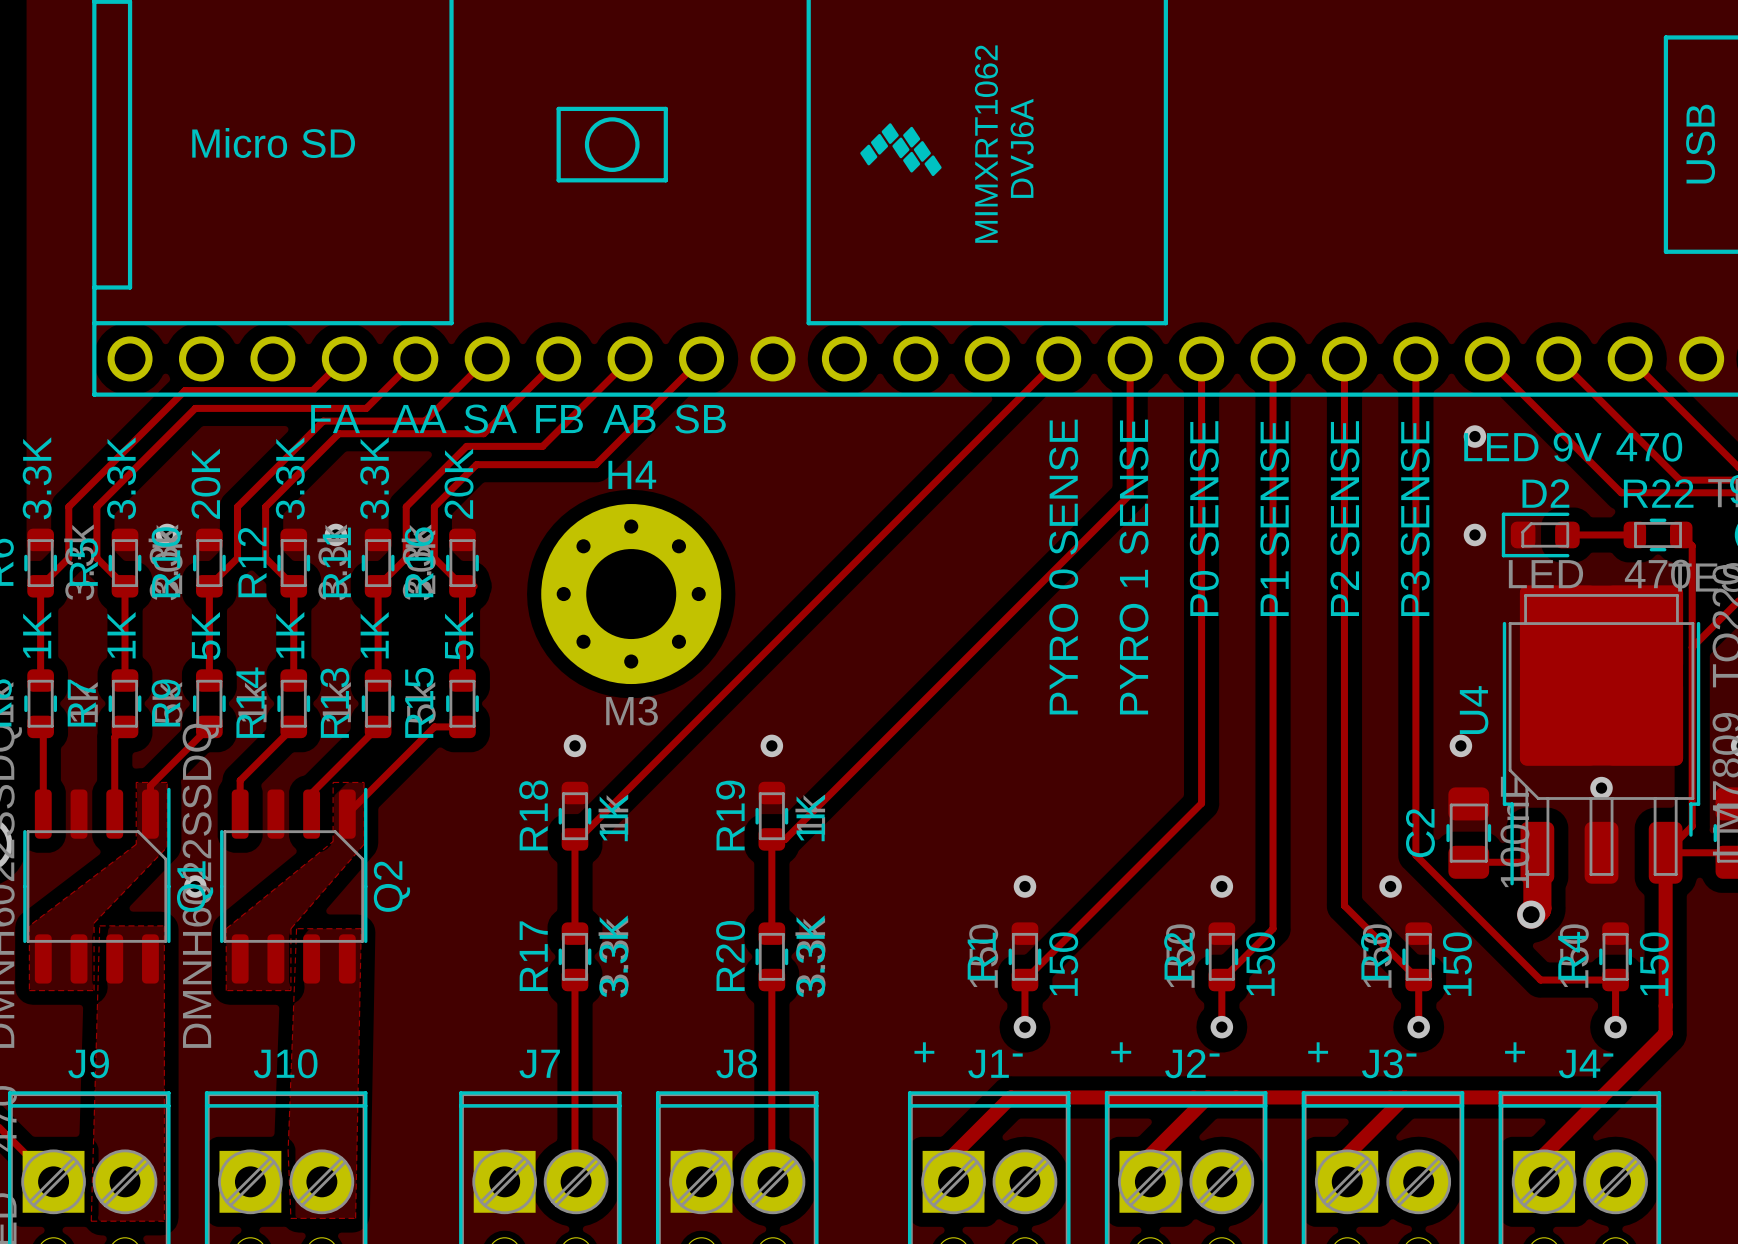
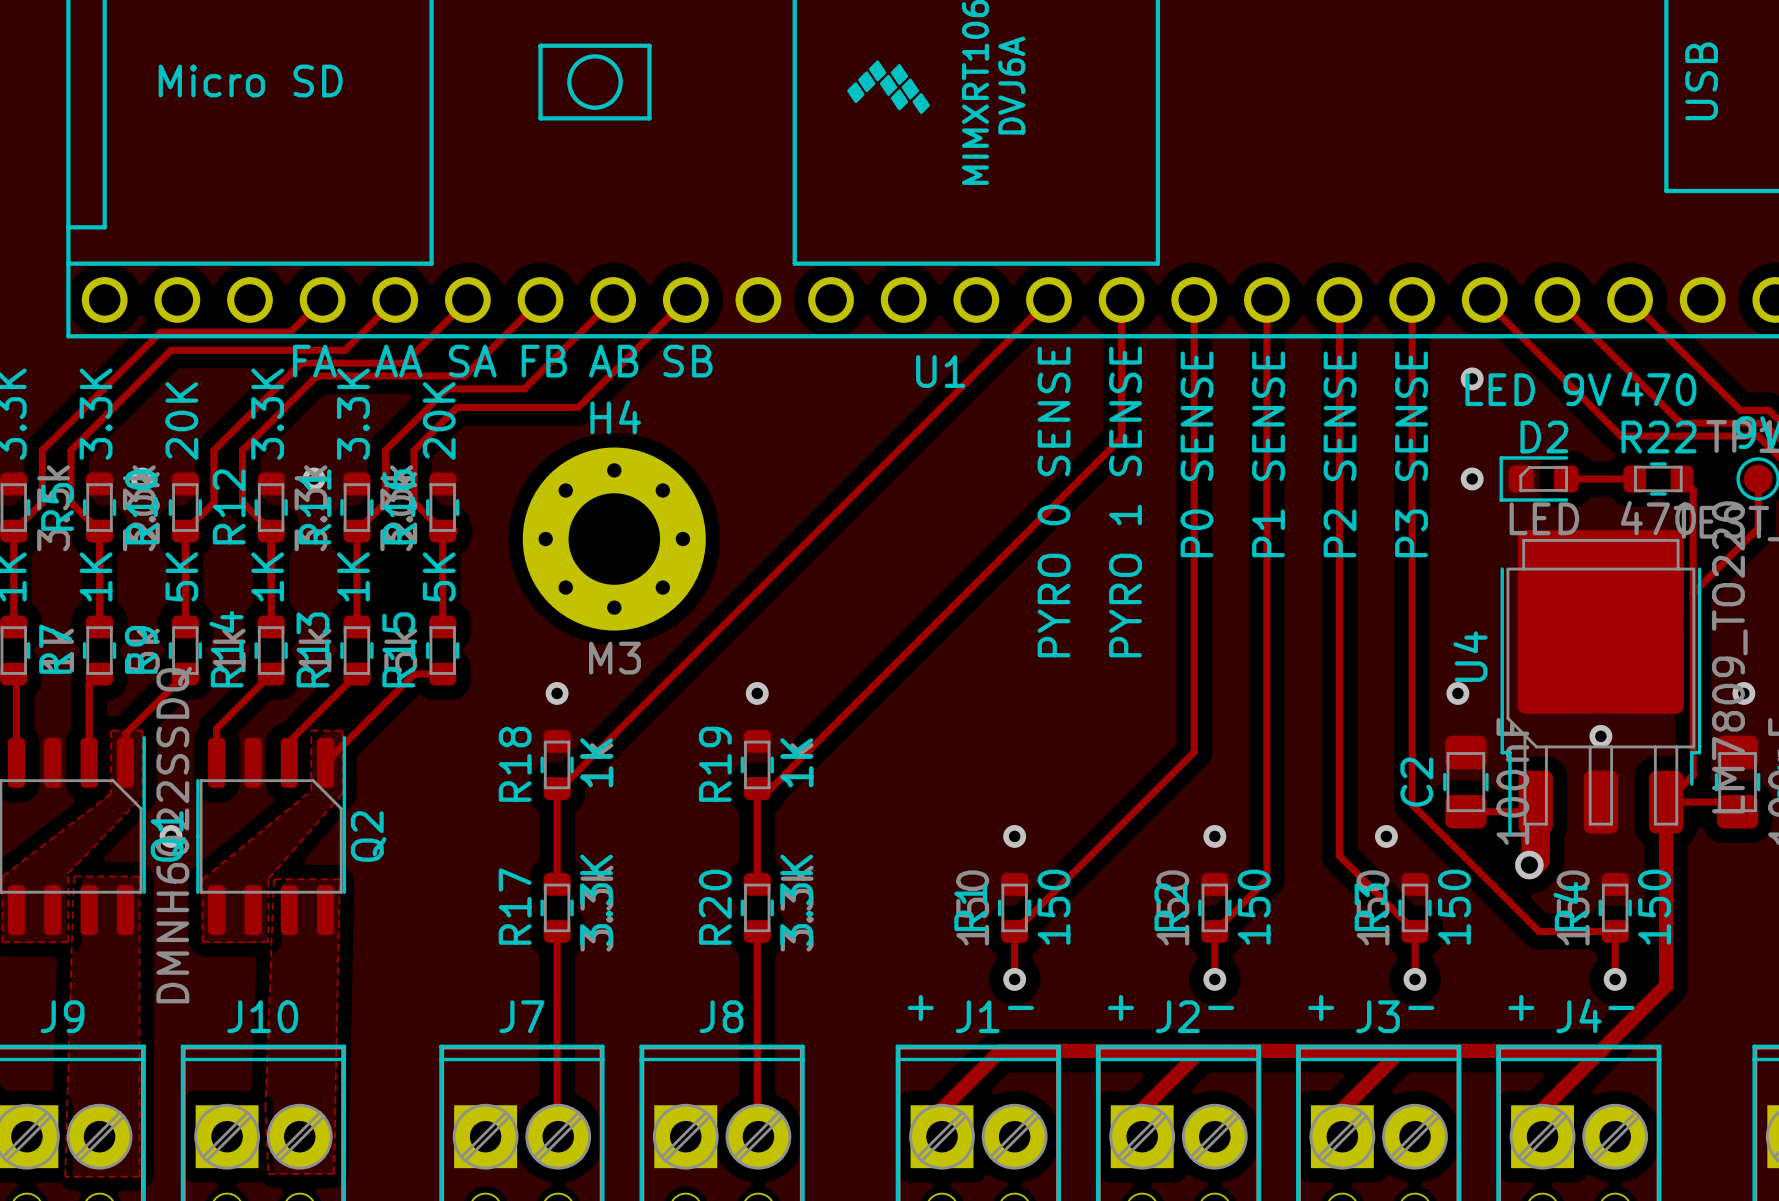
U1 name: none -> U1 (940, 371)

